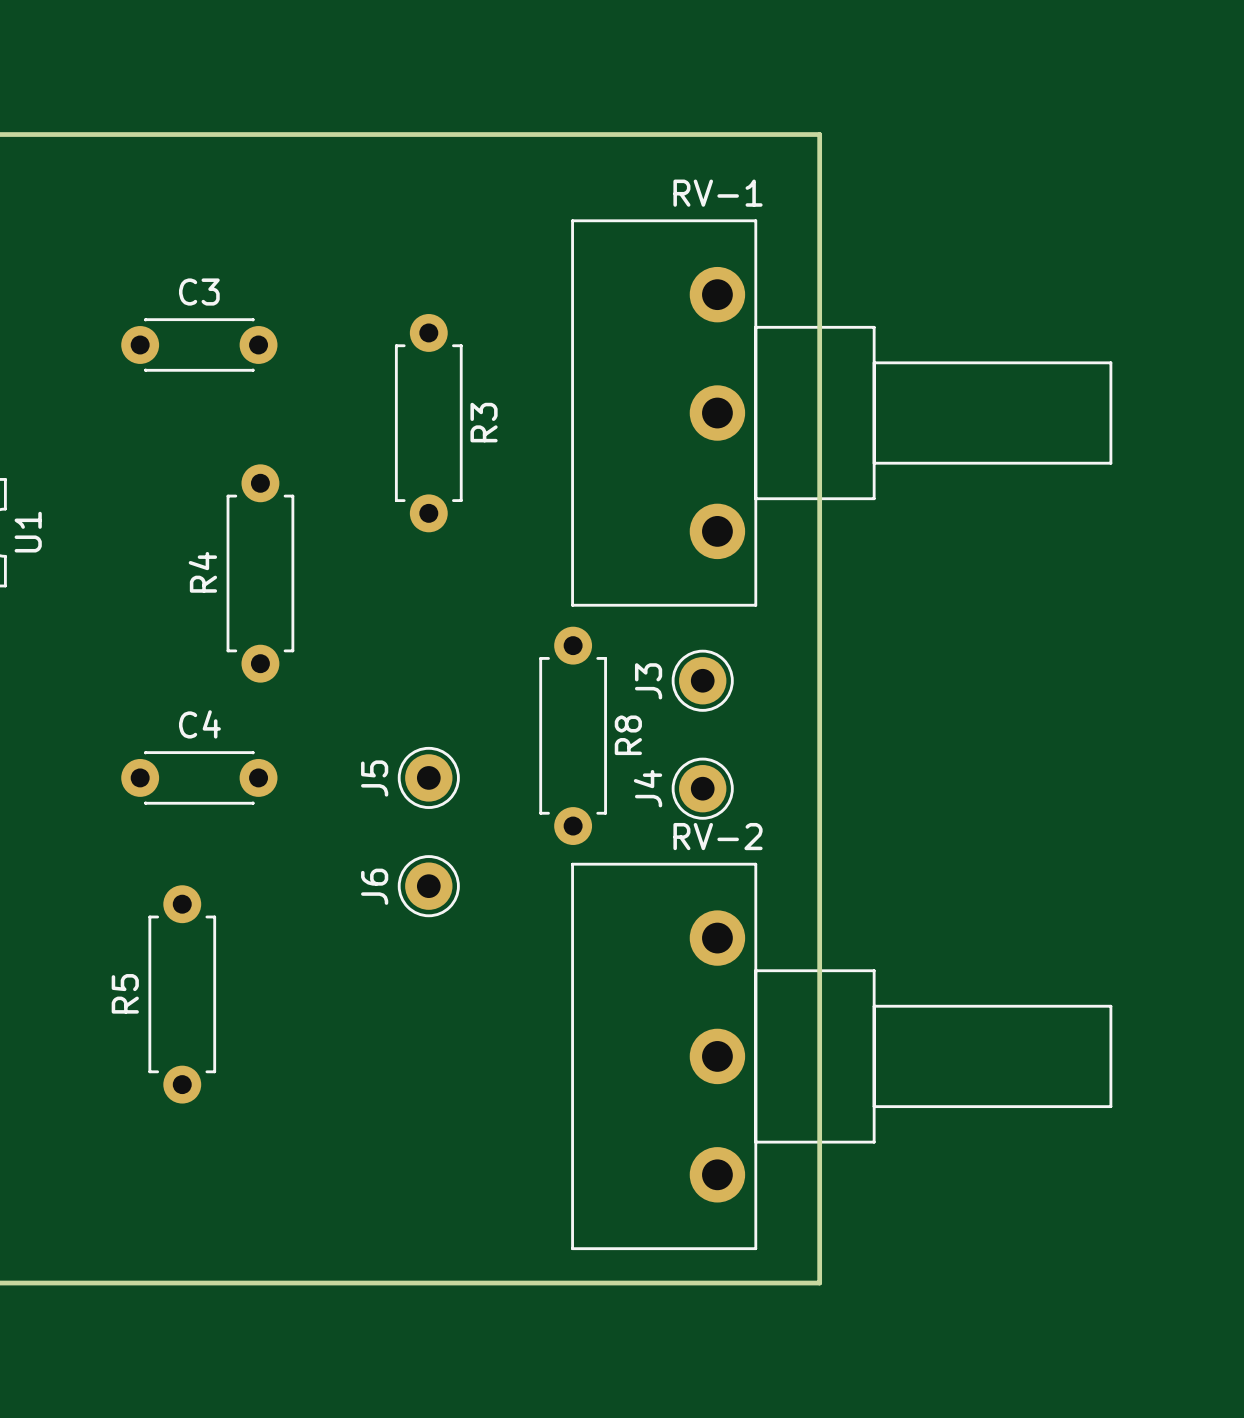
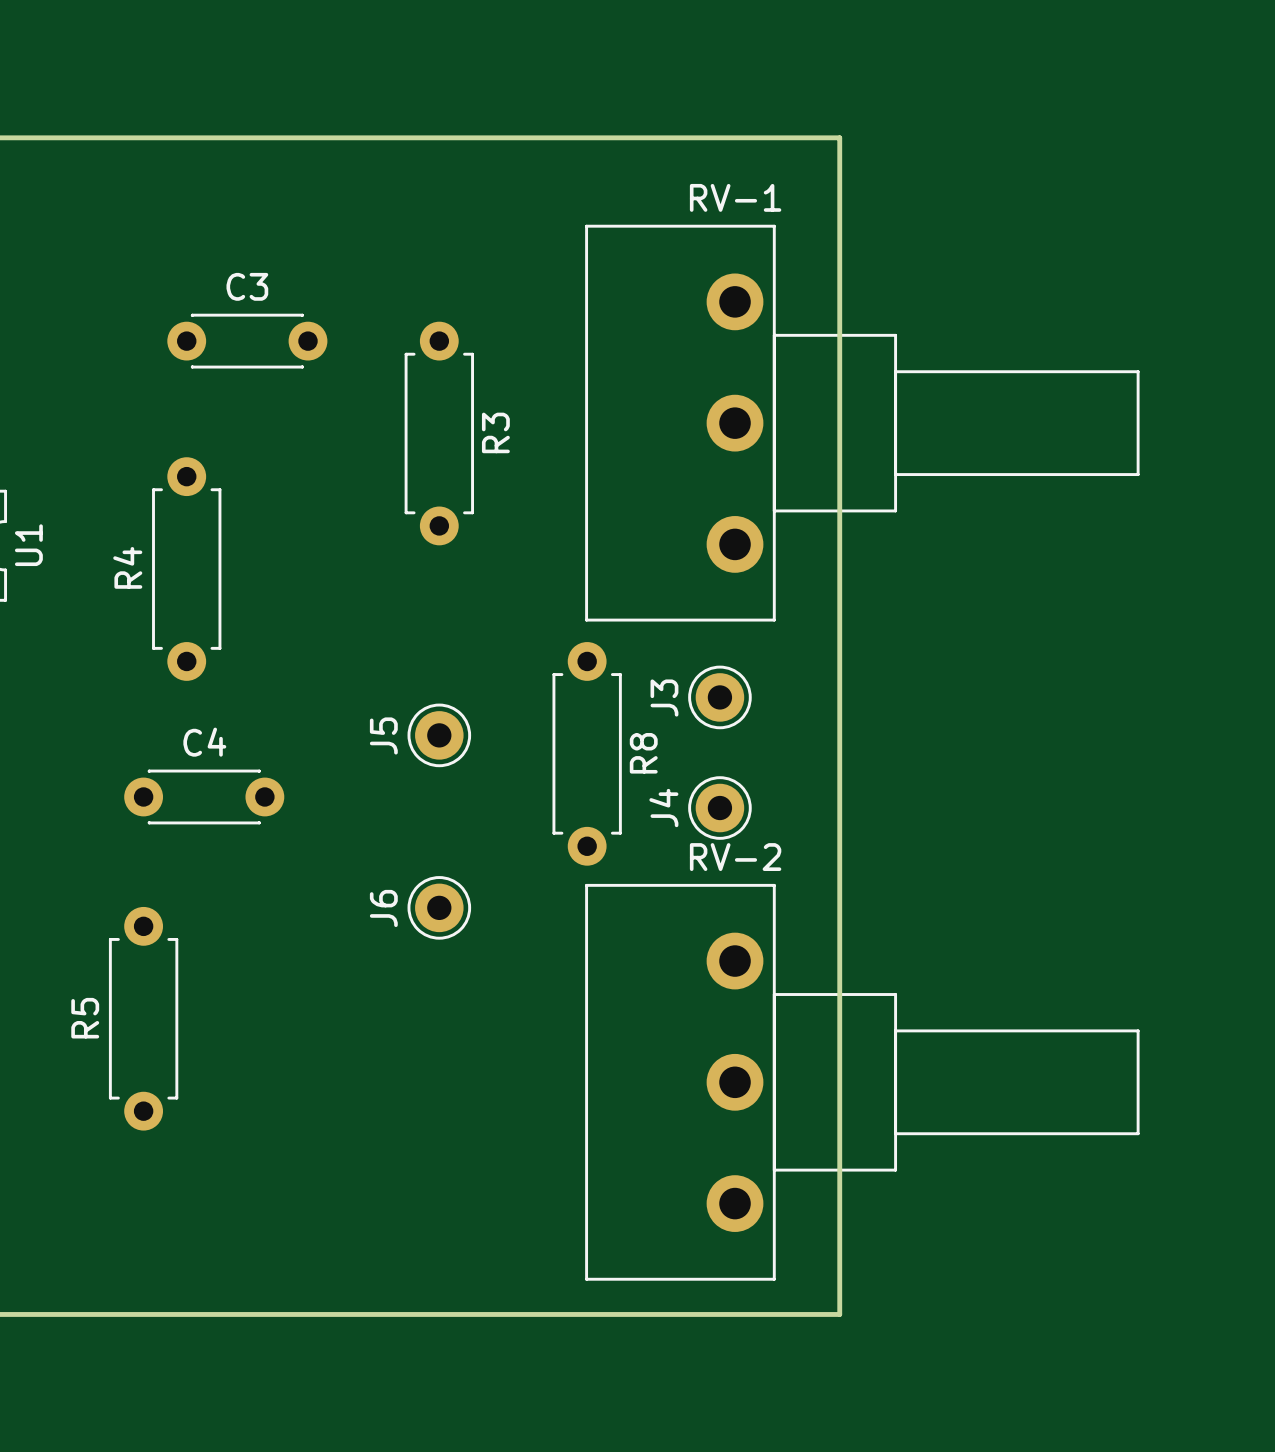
C3 position: (199, 344) -> (247, 341)
R4 position: (260, 573) -> (186, 569)
J5 position: (428, 777) -> (439, 735)
R5 position: (182, 994) -> (143, 1018)

